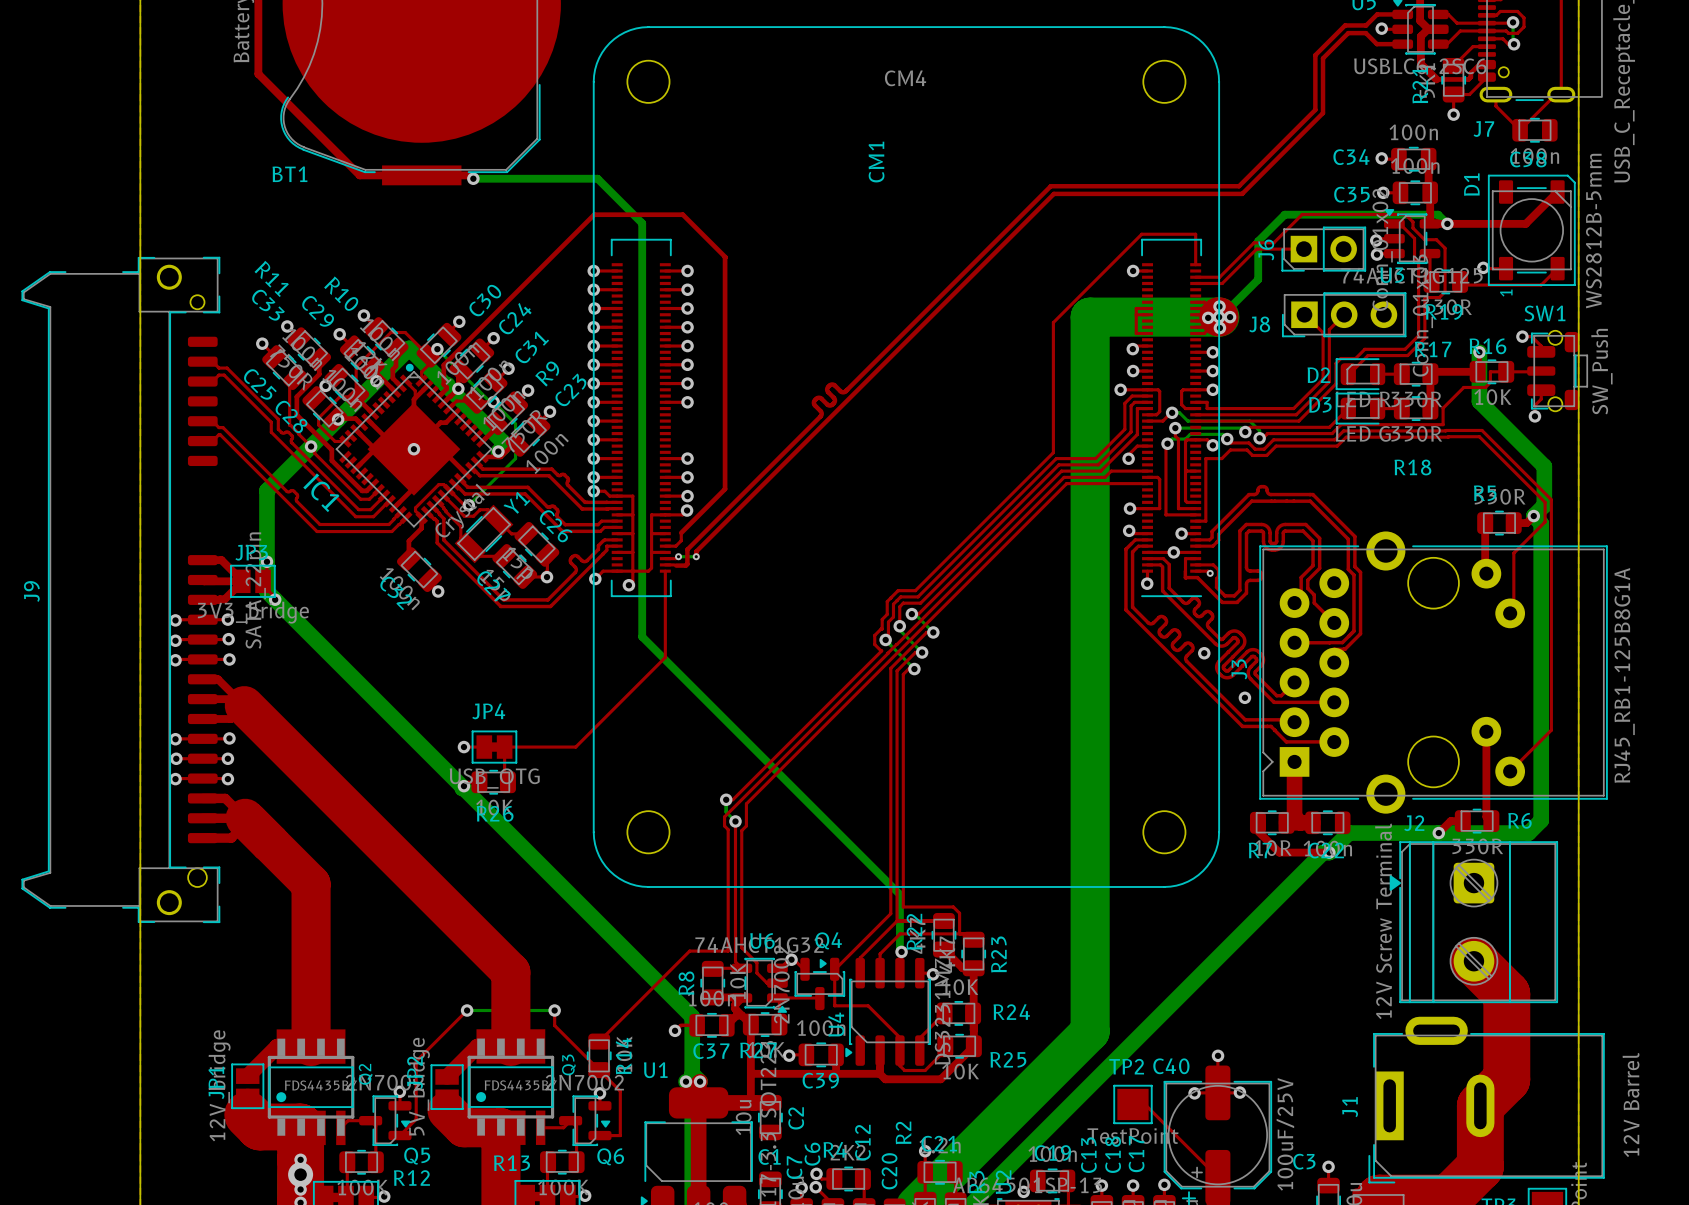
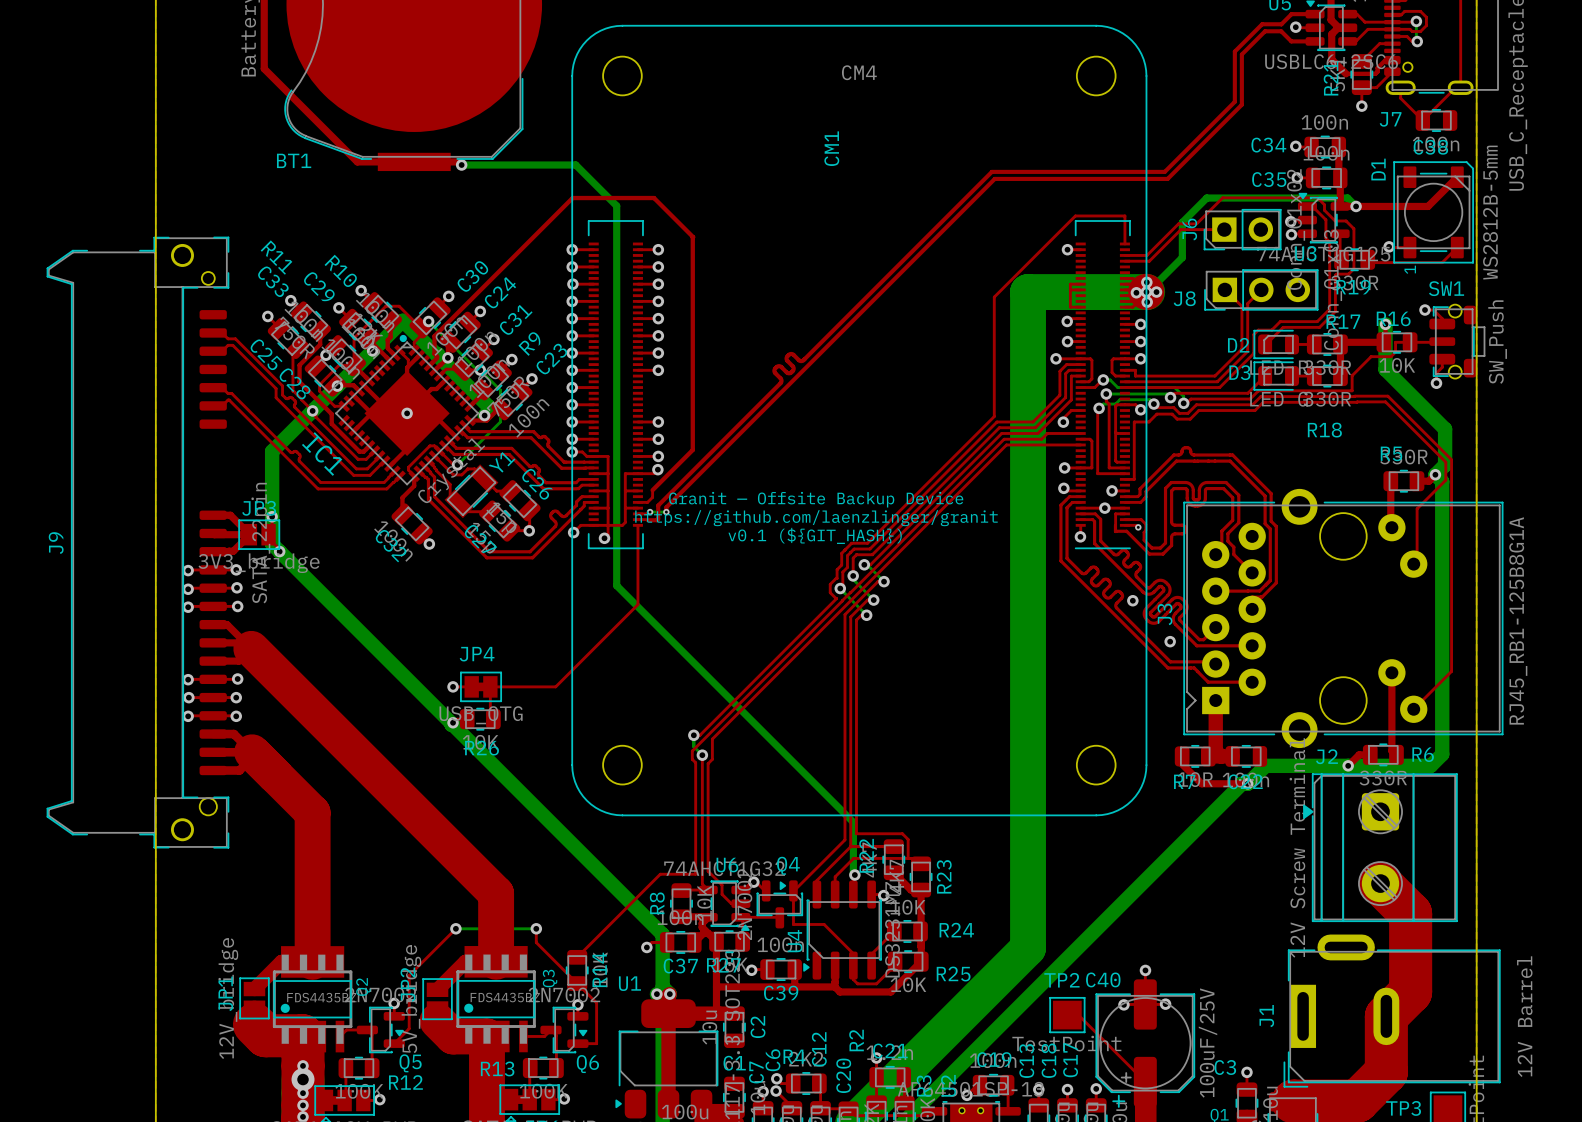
text: none -> Granit — Offsite Backup Device (816, 499)
text: none -> https://github.com/laenzlinger/granit (816, 518)
text: none -> v0.1 (${GIT_HASH}) (815, 535)

